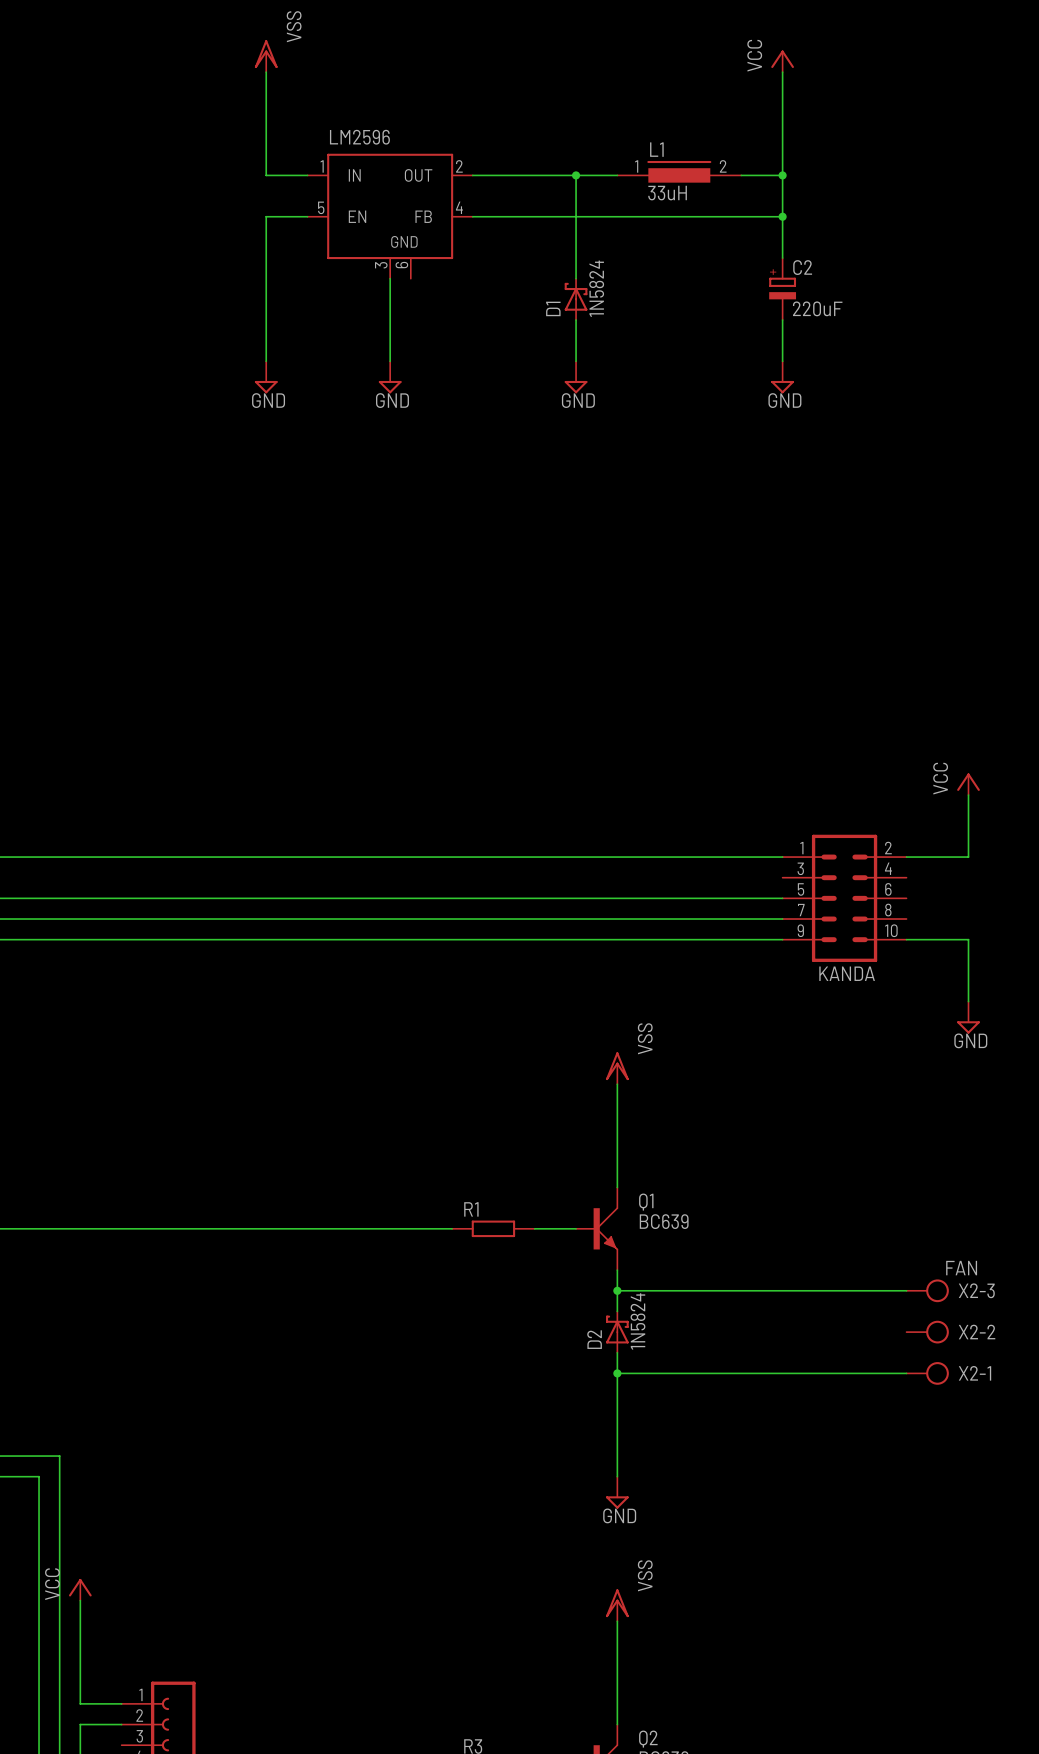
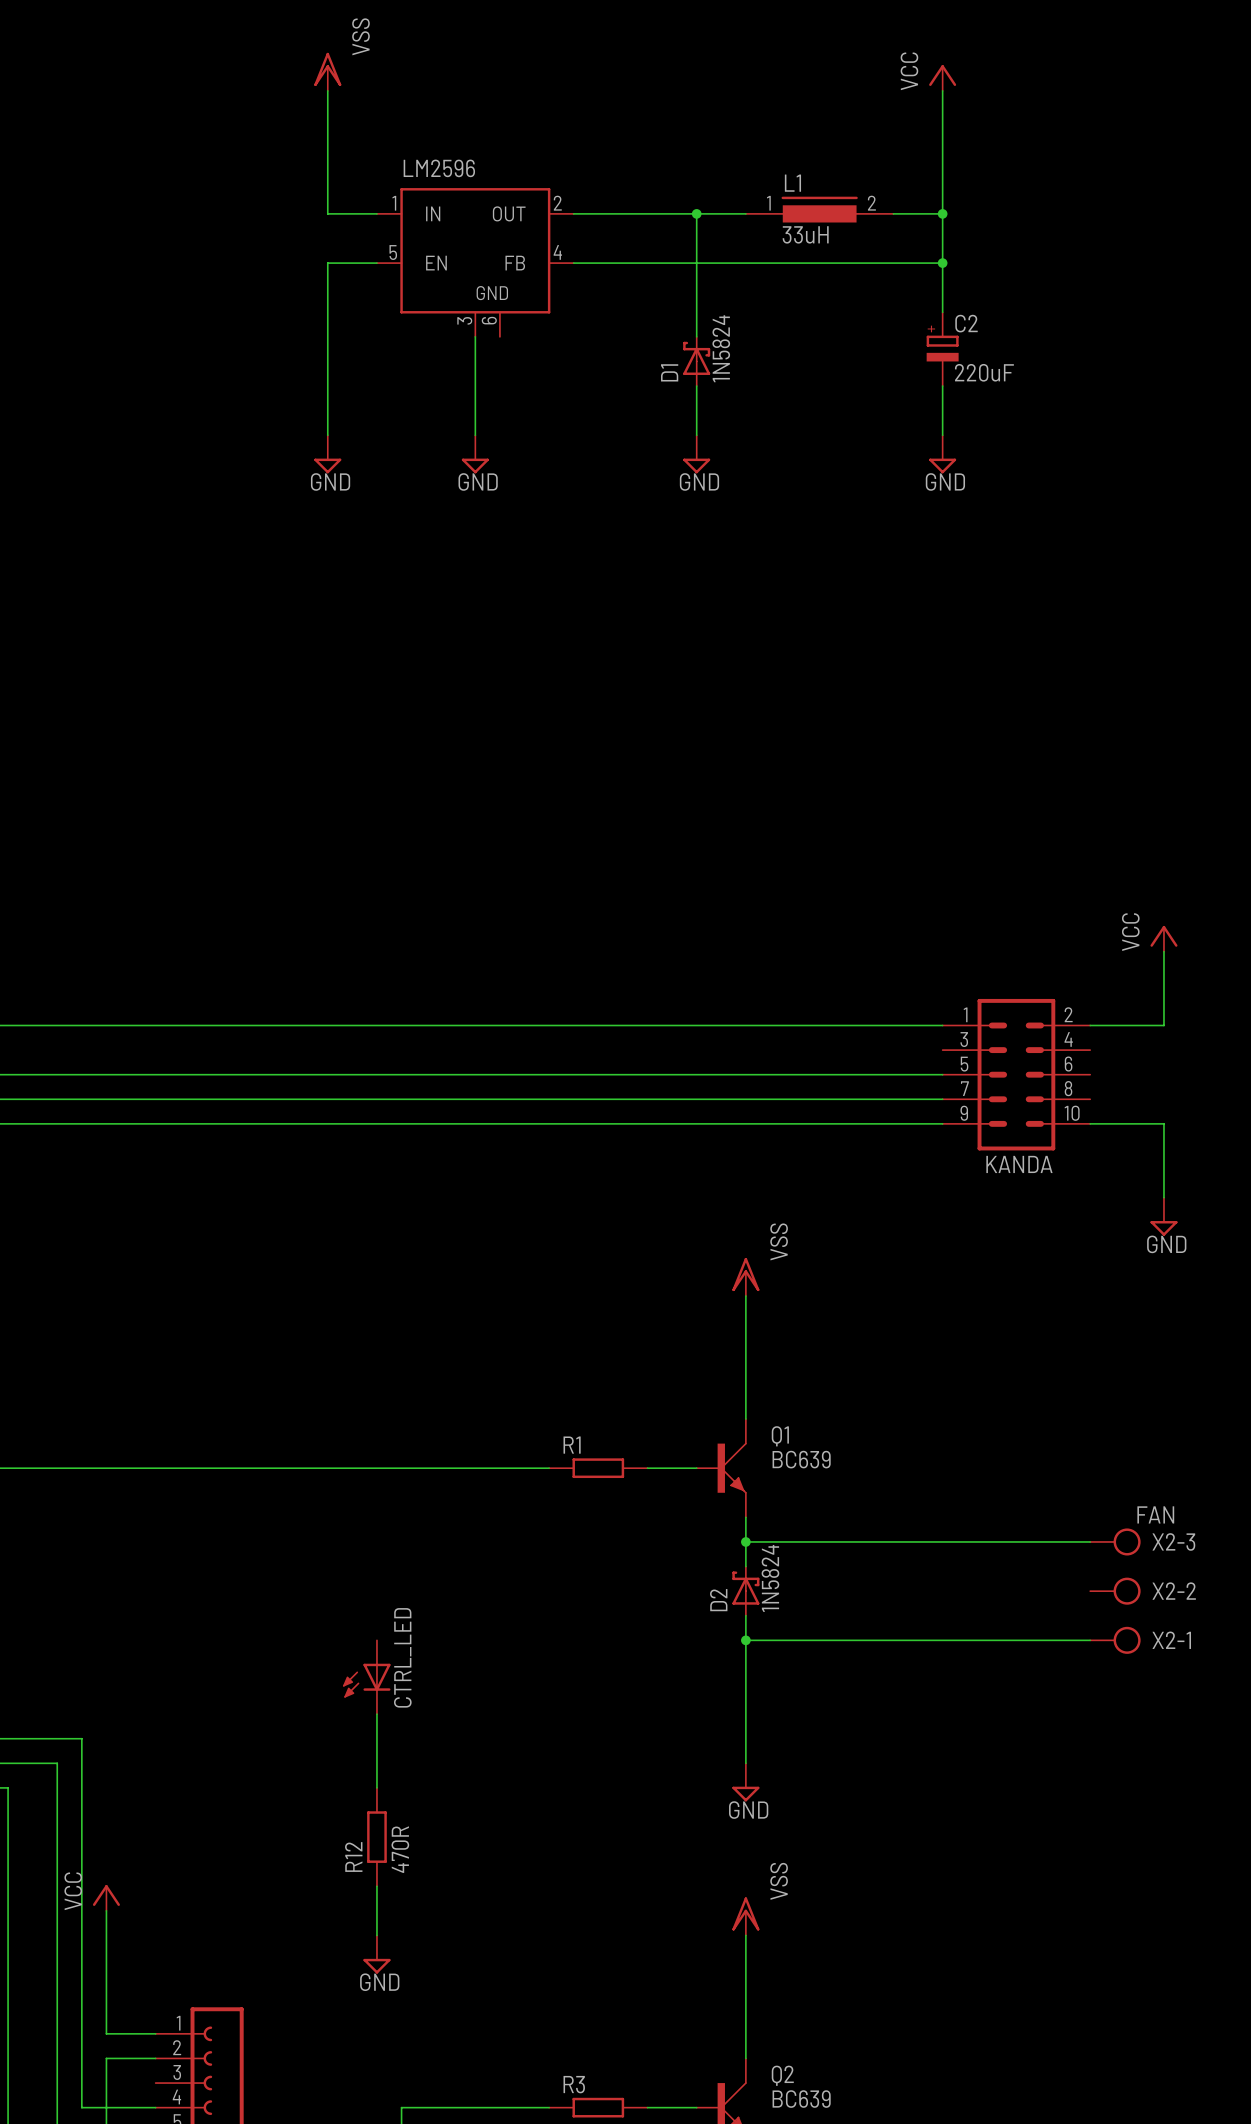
CTRL_LED: none -> (366, 1677)
wire: none -> (376, 1714) (376, 1787)
R12: none -> 470R (376, 1837)
wire: none -> (376, 1886) (376, 1935)
power symbol: none -> GND (376, 1954)

